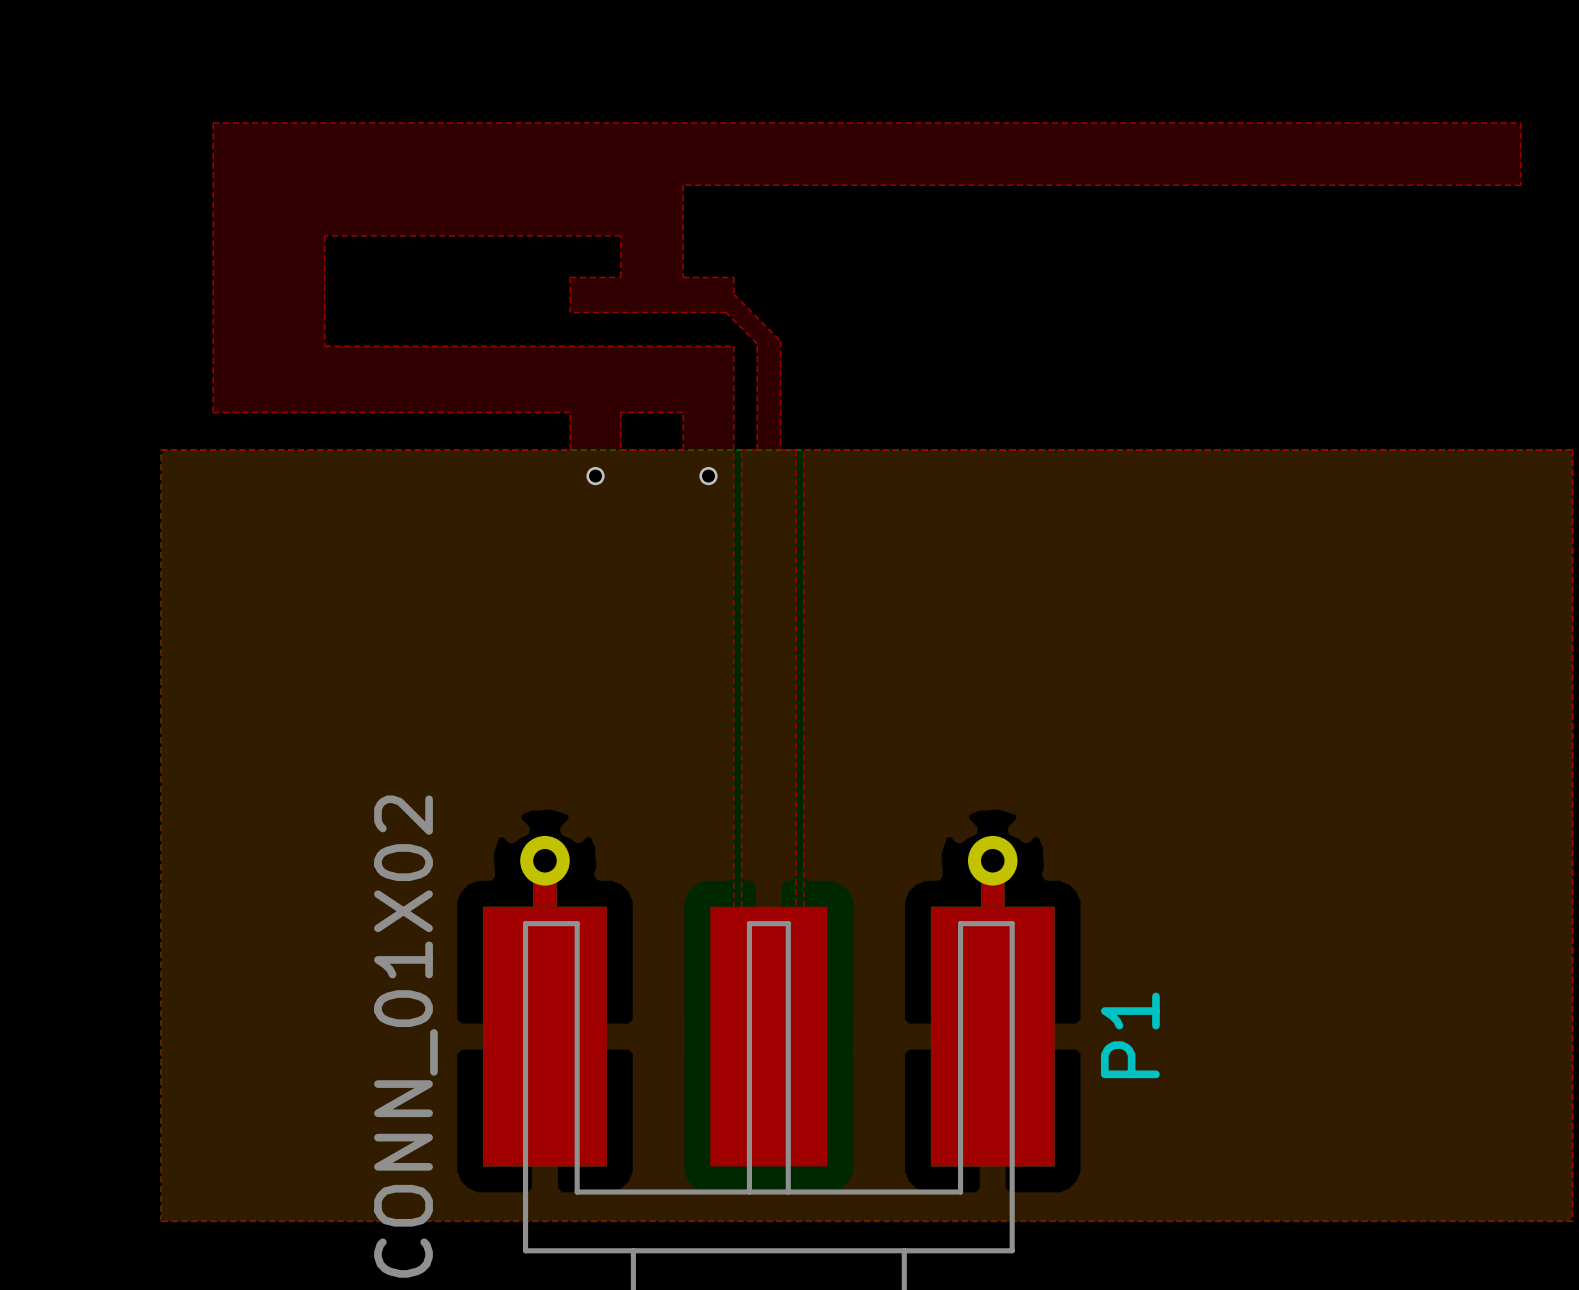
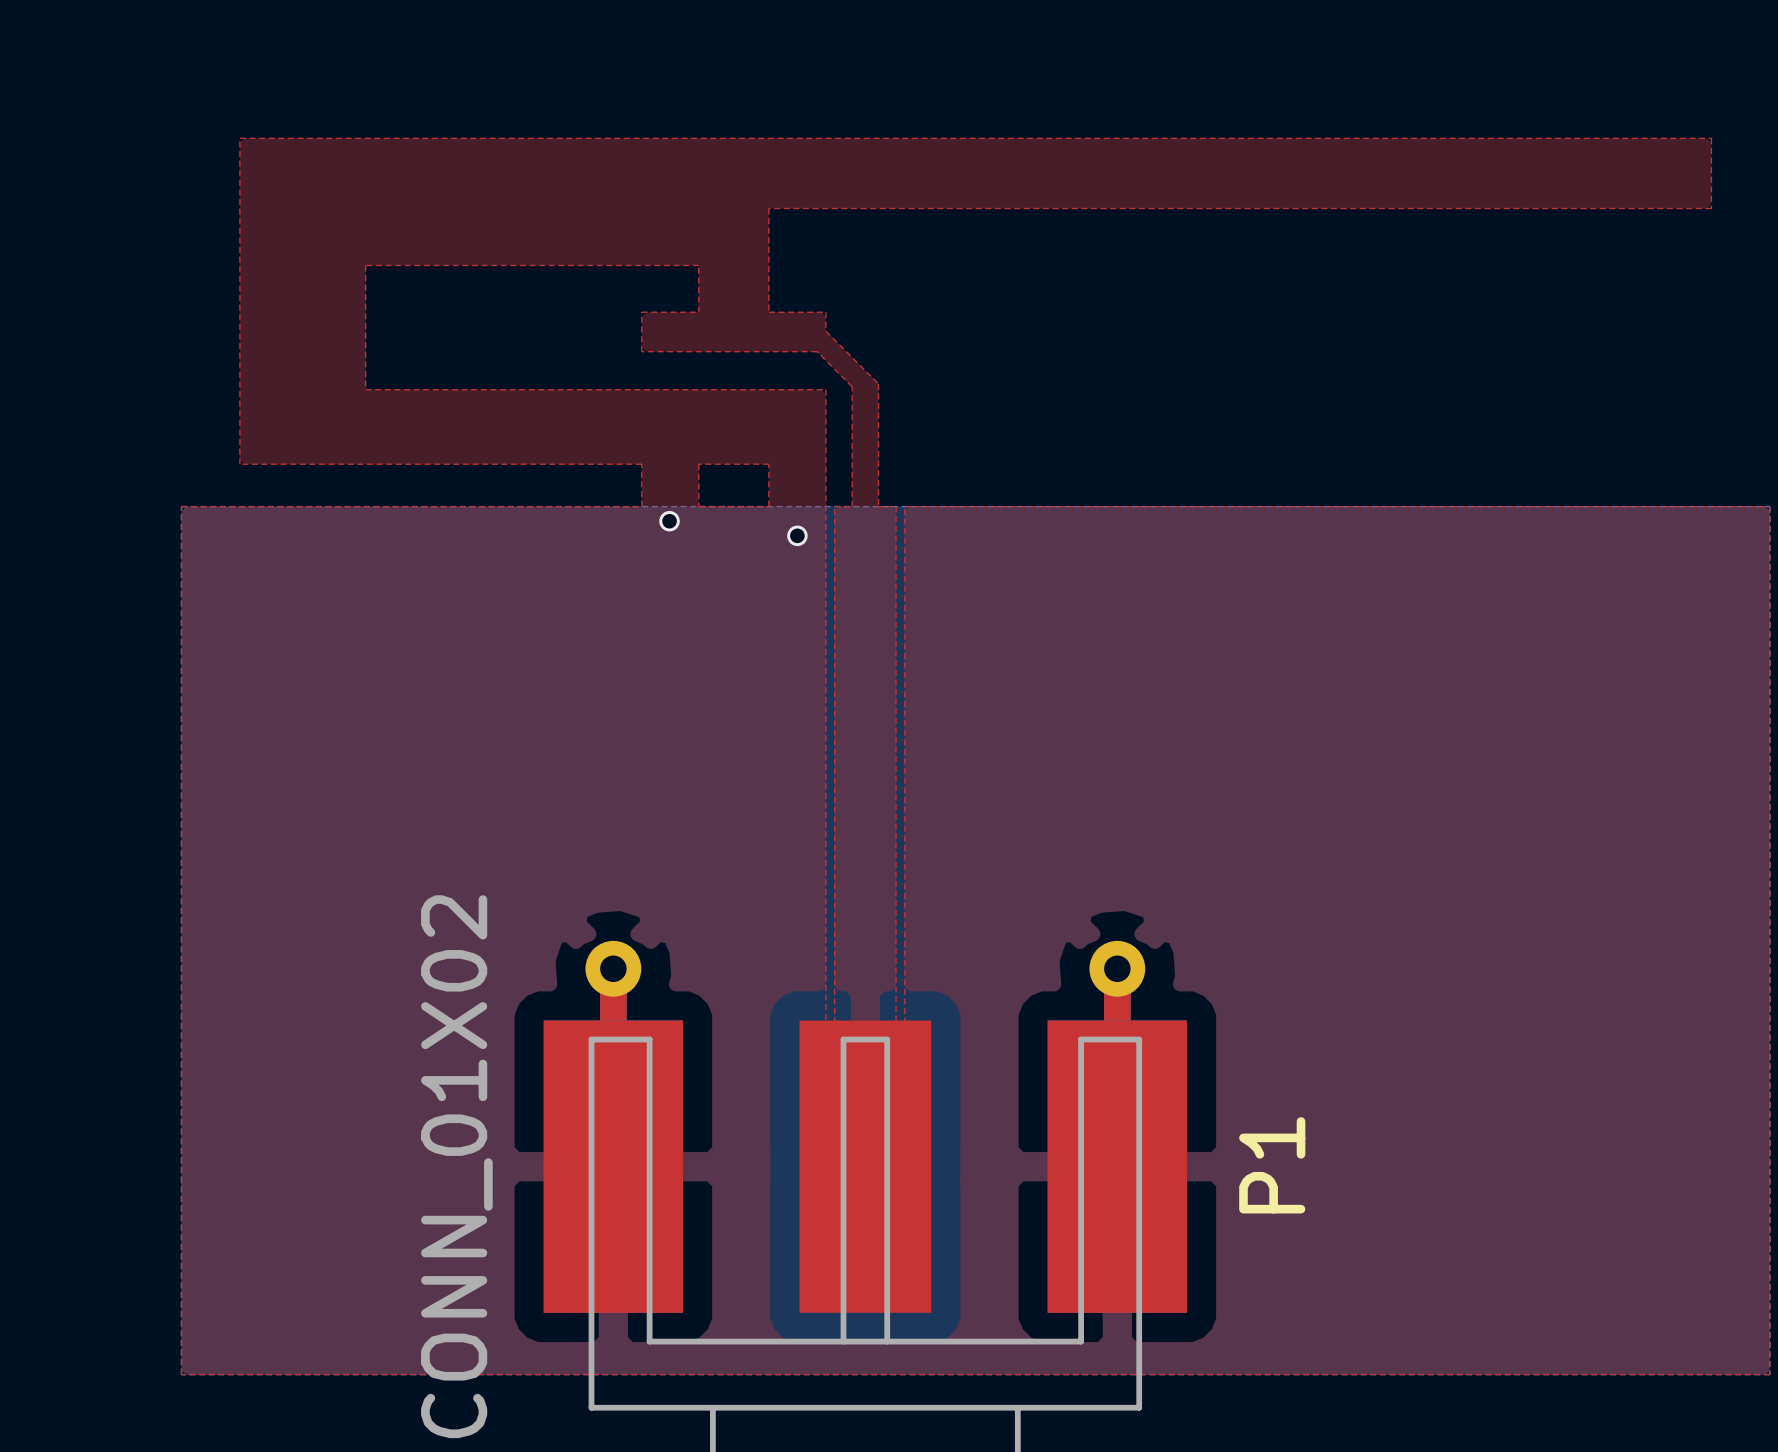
via position: (595, 476) -> (669, 521)

